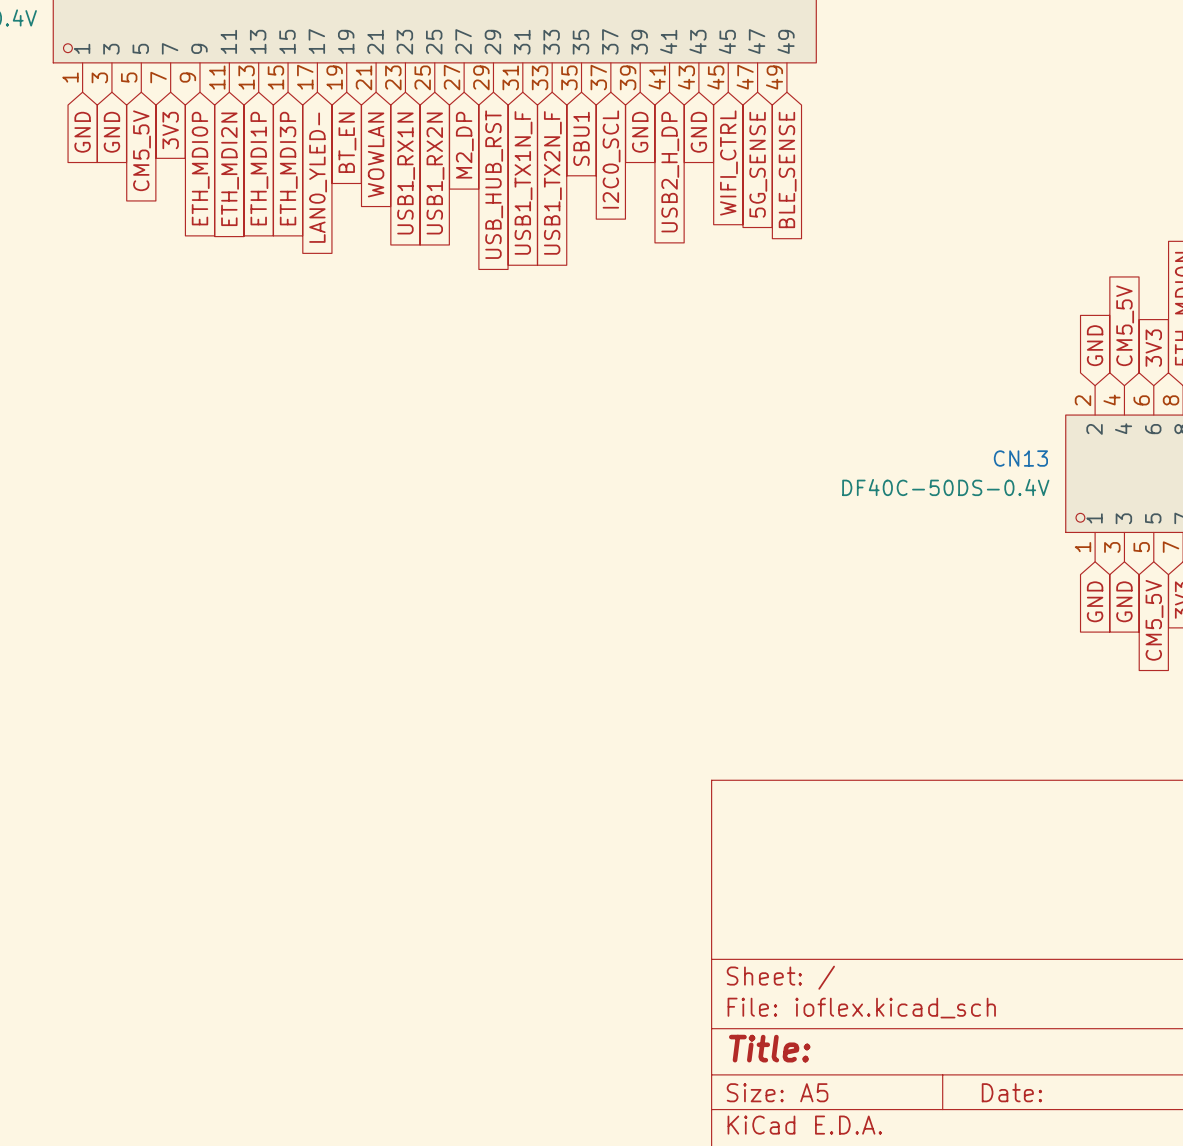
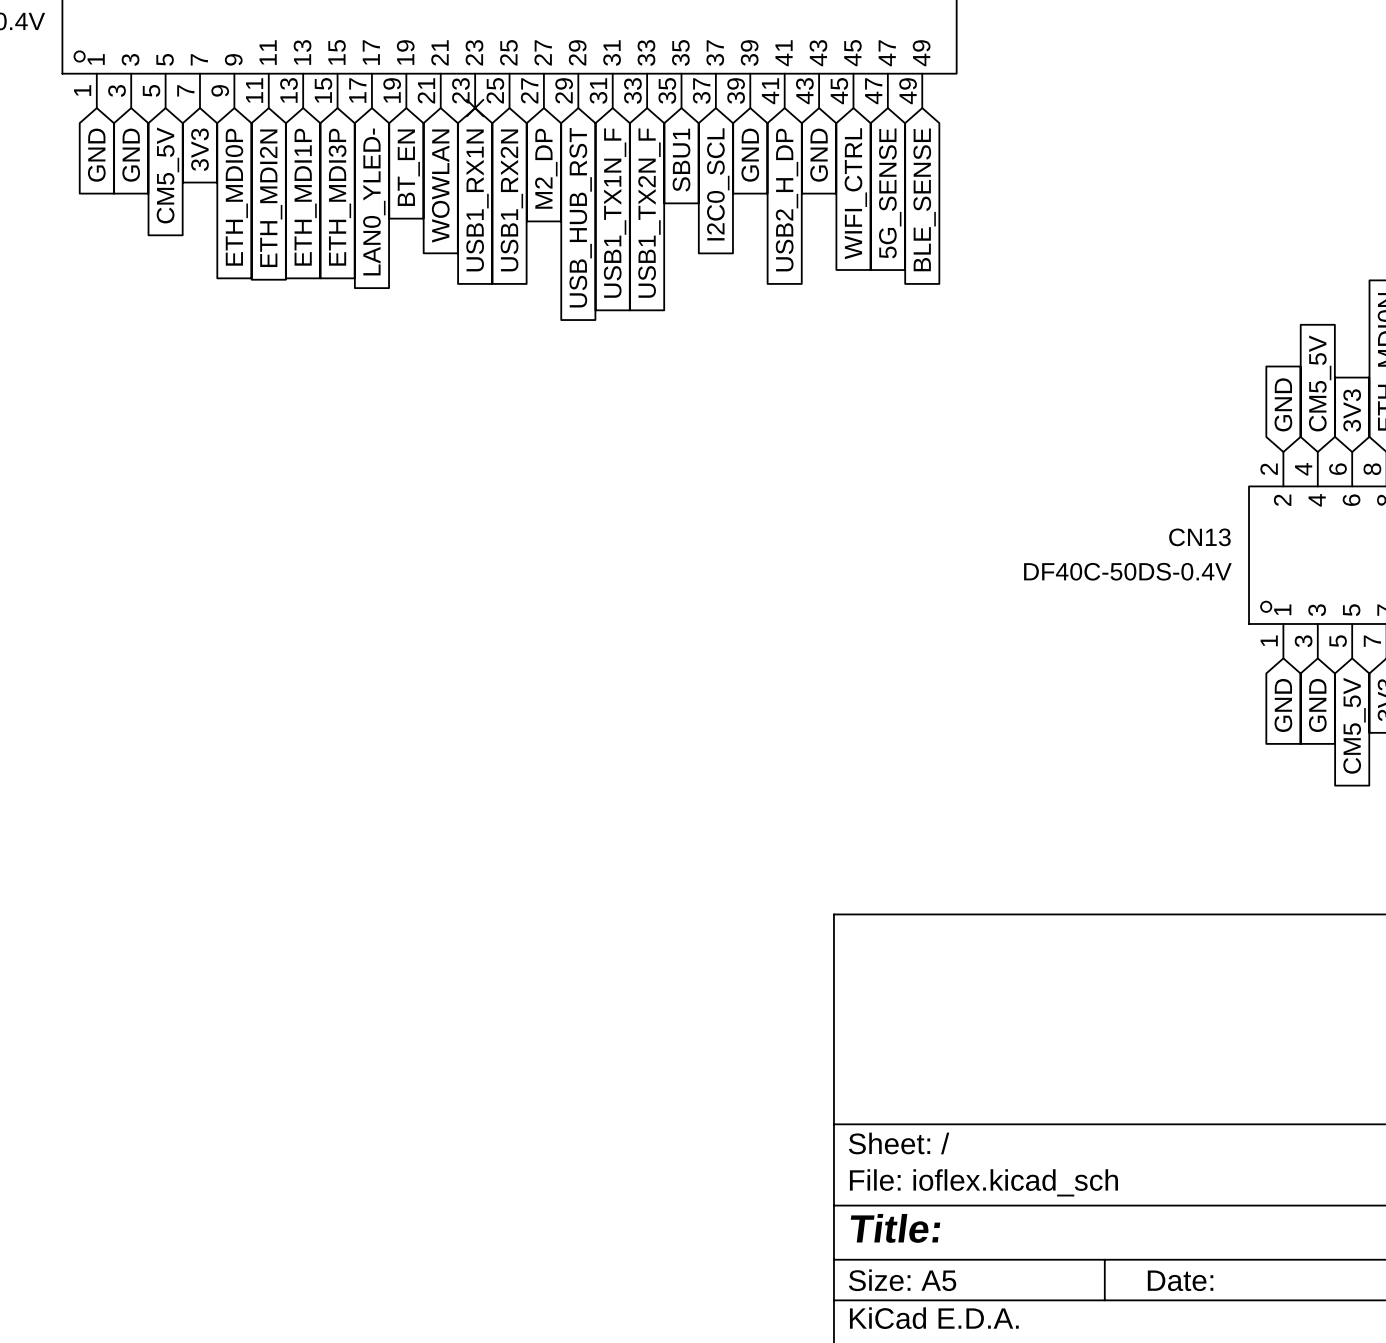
no-connect mark: none -> (475, 108)

